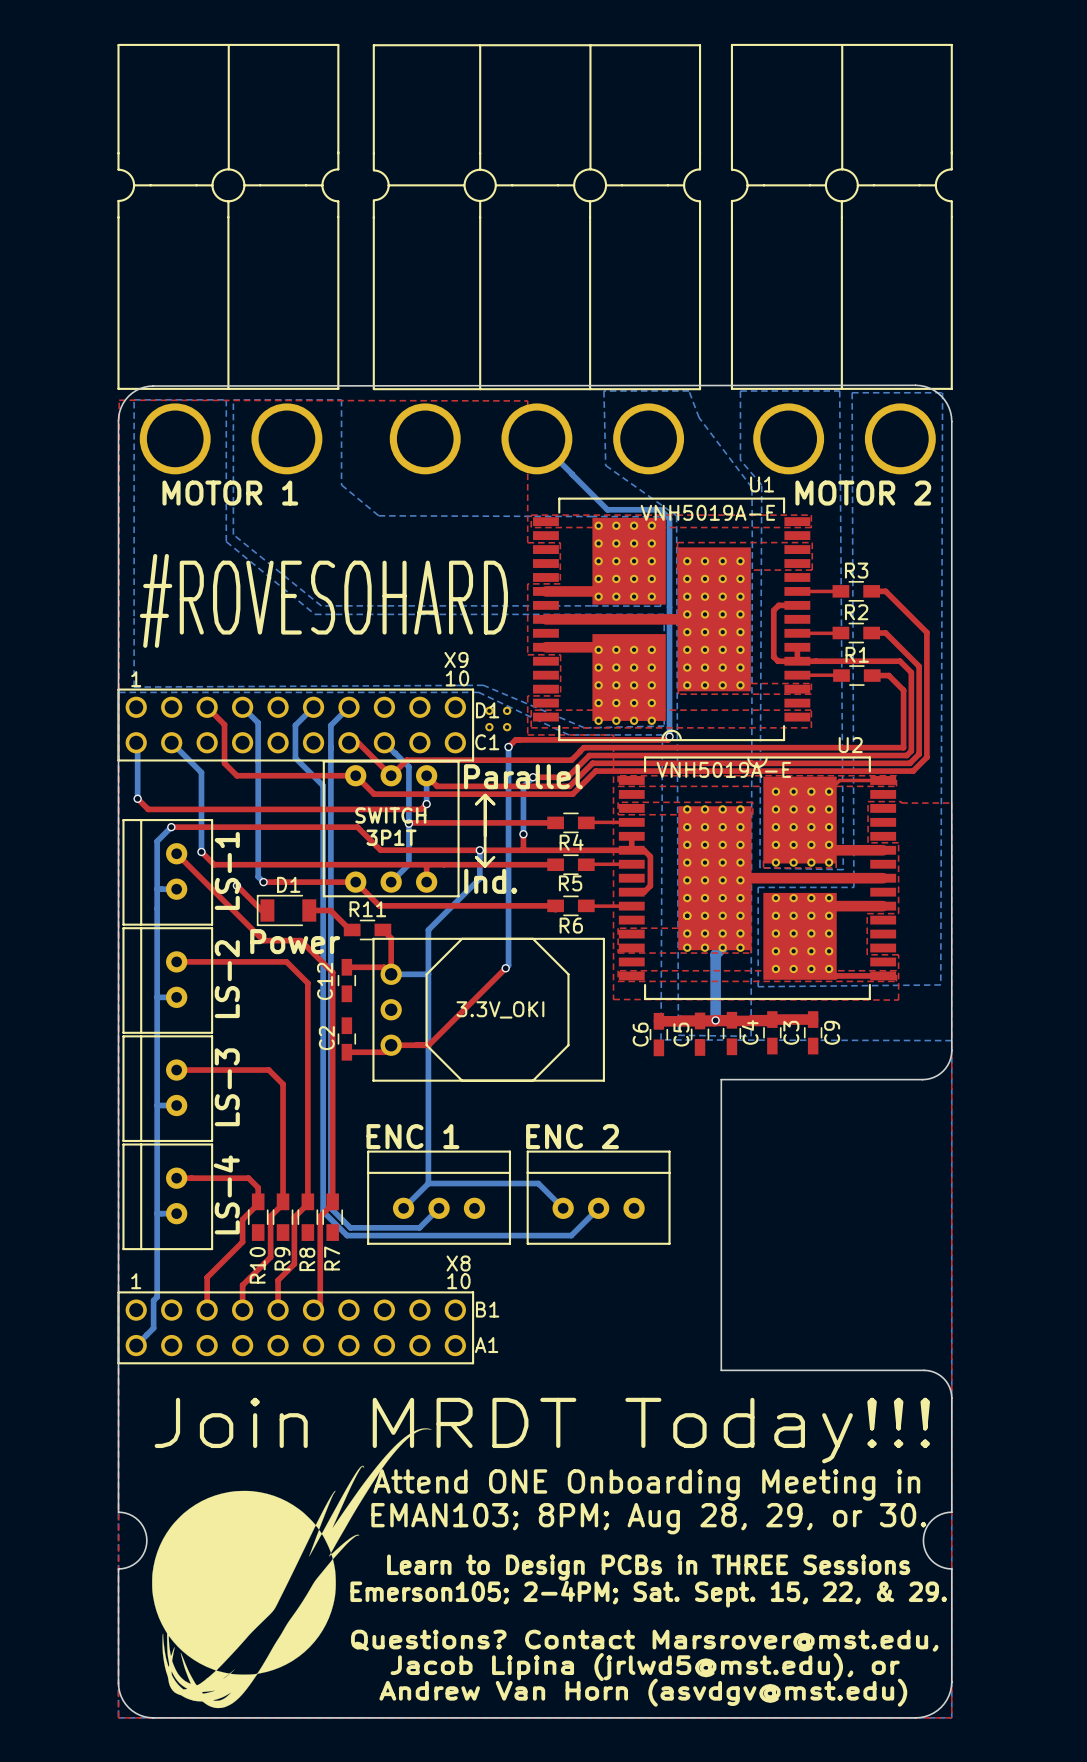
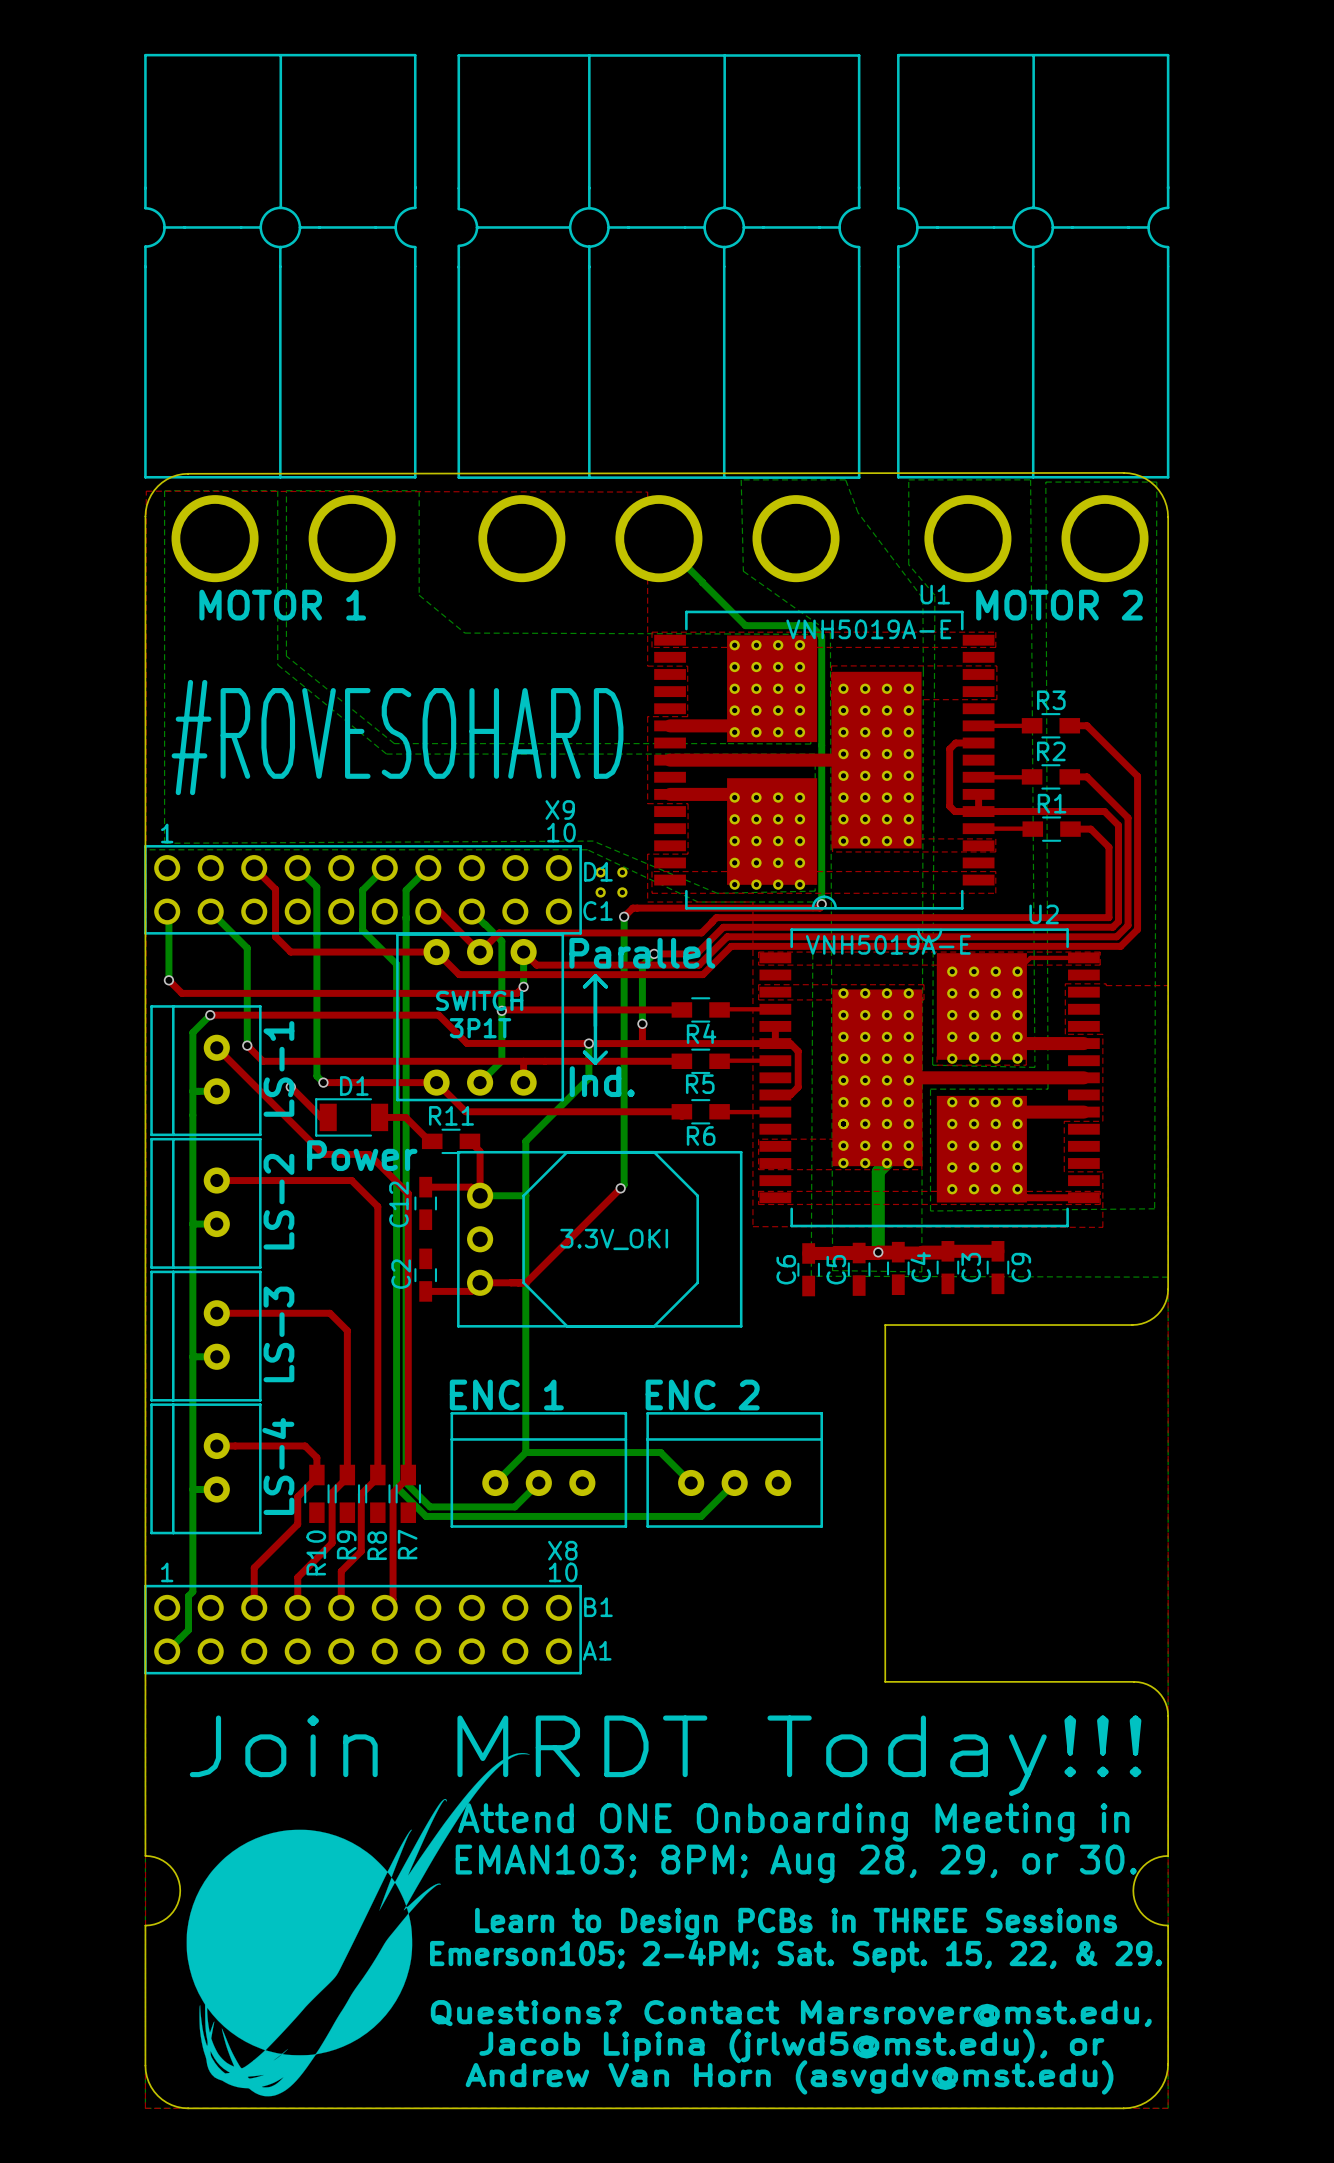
text: Andrew Van Horn (asvdgv@mst.edu) (643, 1692) -> Andrew Van Horn (asvgdv@mst.edu) (789, 2077)

